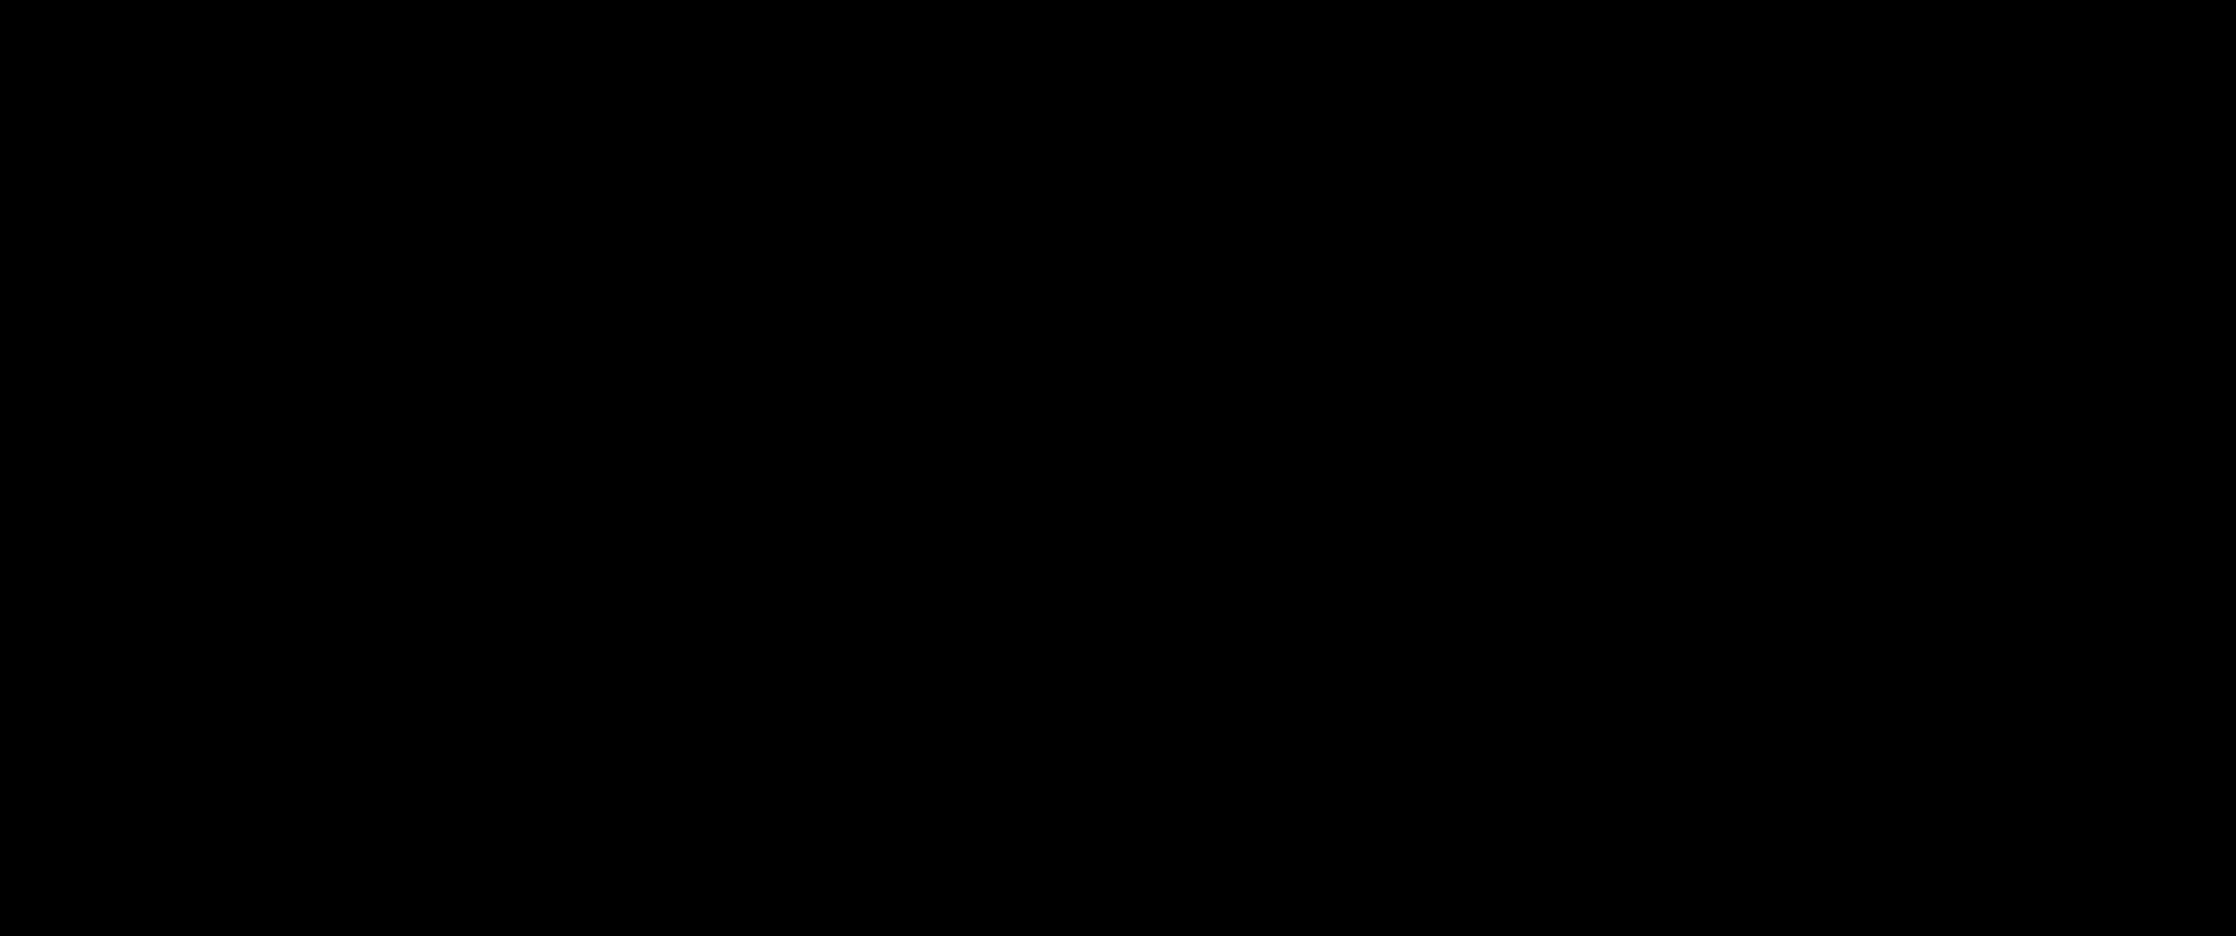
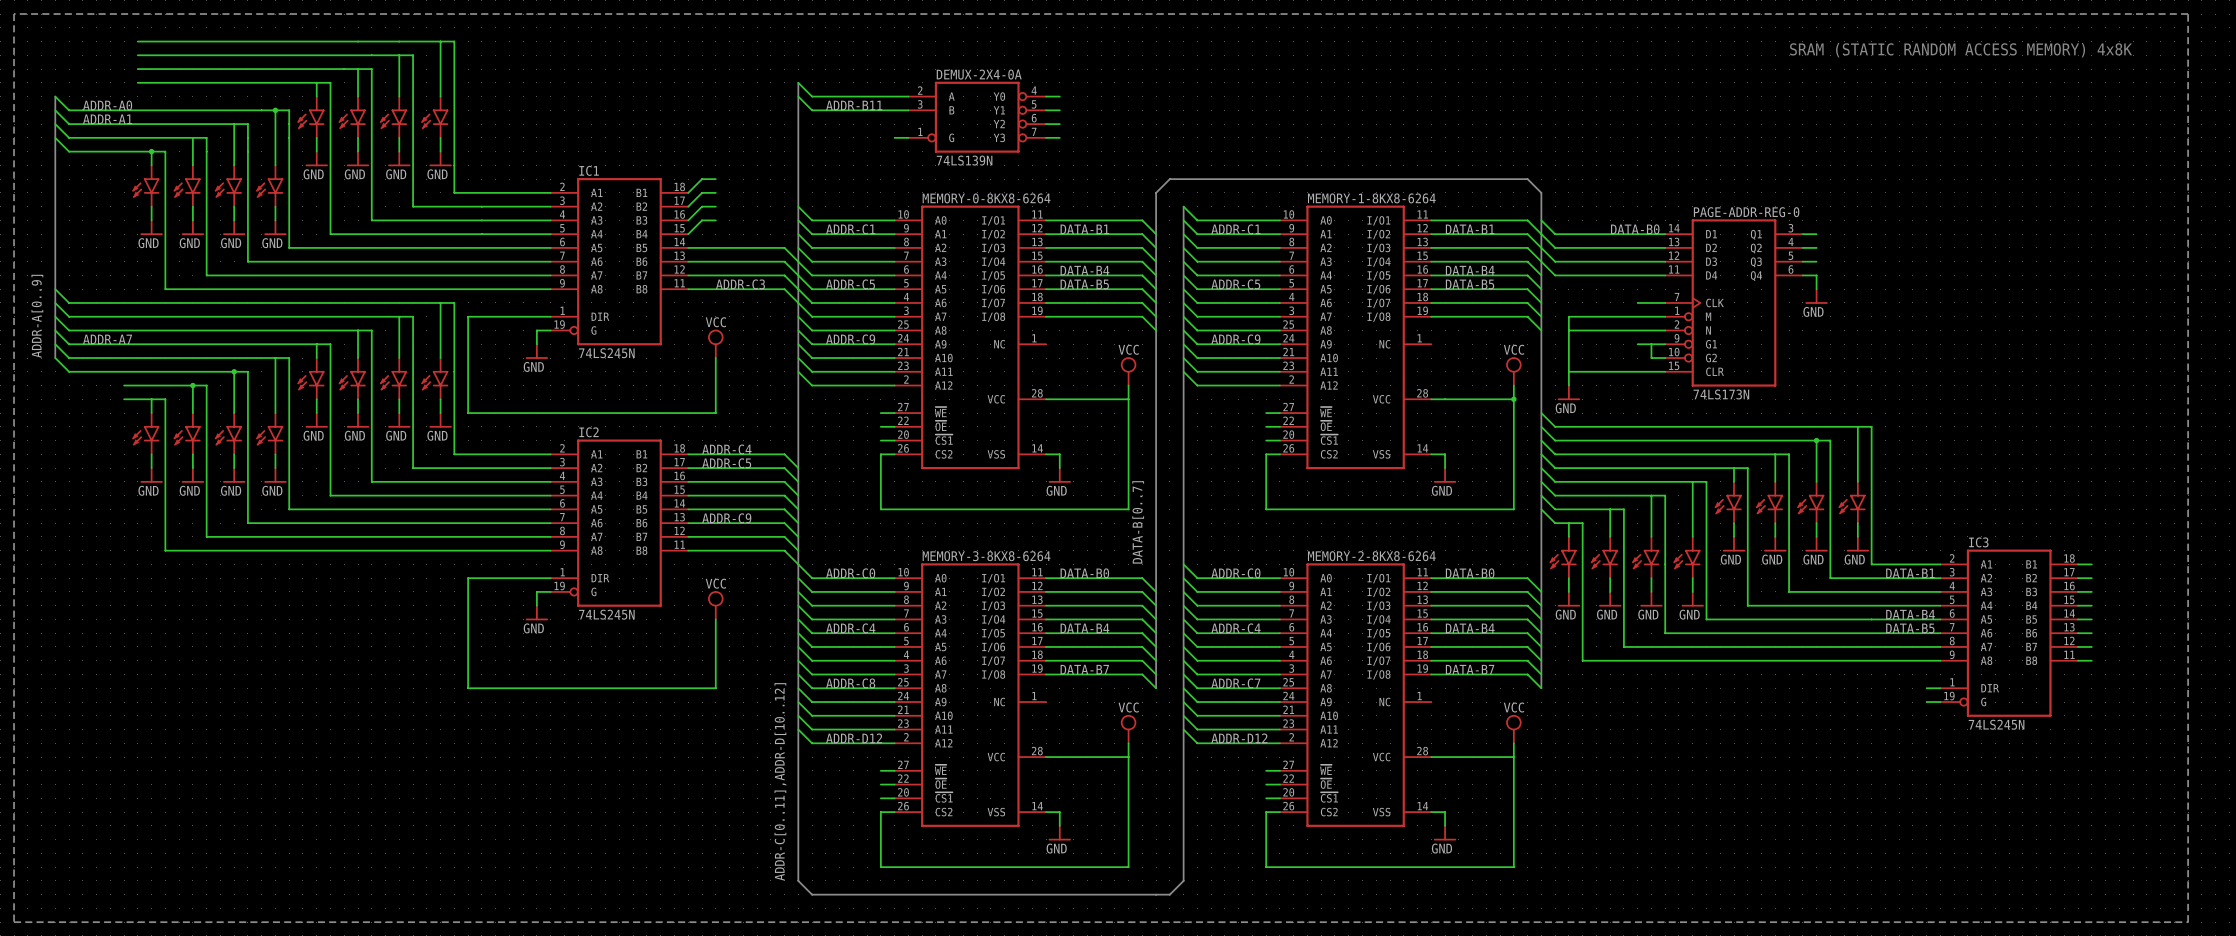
line: none -> (14, 14) (14, 922) (2188, 922) (2188, 14) (14, 14)
wire: none -> (137, 41) (454, 41) (454, 192) (550, 192)
wire: none -> (440, 41) (440, 96)
text: none -> SRAM (STATIC RANDOM ACCESS MEMORY) 4x8K (1961, 50)
wire: none -> (137, 55) (413, 55) (413, 206) (550, 206)
wire: none -> (399, 55) (399, 96)
wire: none -> (137, 69) (371, 69) (371, 220) (550, 220)
wire: none -> (358, 69) (358, 96)
wire: none -> (137, 82) (330, 82) (330, 234) (550, 234)
wire: none -> (316, 82) (316, 96)
bus: none -> (798, 82) (798, 880) (812, 894) (1169, 894) (1183, 880) (1183, 206)
wire: none -> (798, 82) (812, 96) (908, 96)
bus: none -> (55, 96) (55, 358)
wire: none -> (55, 96) (69, 110) (289, 110) (289, 247) (550, 247)
wire: none -> (798, 96) (812, 110) (908, 110)
wire: none -> (1046, 96) (1059, 96)
label: none -> ADDR-A0 (107, 105)
label: none -> ADDR-B11 (854, 105)
wire: none -> (55, 110) (69, 124) (247, 124) (247, 261) (550, 261)
wire: none -> (275, 110) (275, 165)
junction: none -> (275, 110)
wire: none -> (1046, 110) (1059, 110)
part: none -> (311, 117)
part: none -> (352, 117)
part: none -> (393, 117)
part: none -> (434, 117)
DEMUX-2X4-0A: none -> 74LS139N (977, 117)
label: none -> ADDR-A1 (107, 119)
wire: none -> (55, 124) (69, 137) (206, 137) (206, 275) (550, 275)
wire: none -> (234, 124) (234, 165)
wire: none -> (1046, 124) (1059, 124)
wire: none -> (55, 137) (69, 151) (165, 151) (165, 289) (550, 289)
wire: none -> (192, 137) (192, 165)
wire: none -> (316, 137) (316, 151)
wire: none -> (358, 137) (358, 151)
wire: none -> (399, 137) (399, 151)
wire: none -> (440, 137) (440, 151)
wire: none -> (894, 137) (908, 137)
wire: none -> (1046, 137) (1059, 137)
wire: none -> (151, 151) (151, 165)
junction: none -> (151, 151)
power symbol: none -> GND (316, 158)
power symbol: none -> GND (358, 158)
power symbol: none -> GND (399, 158)
power symbol: none -> GND (440, 158)
wire: none -> (715, 179) (702, 179) (688, 192)
part: none -> (145, 186)
part: none -> (187, 186)
part: none -> (228, 186)
part: none -> (269, 186)
wire: none -> (715, 192) (702, 192) (688, 206)
wire: none -> (151, 206) (151, 220)
wire: none -> (192, 206) (192, 220)
wire: none -> (234, 206) (234, 220)
wire: none -> (275, 206) (275, 220)
wire: none -> (715, 206) (702, 206) (688, 220)
wire: none -> (798, 206) (812, 220) (894, 220)
wire: none -> (1183, 206) (1197, 220) (1279, 220)
wire: none -> (715, 220) (702, 220) (688, 234)
wire: none -> (798, 220) (812, 234) (894, 234)
wire: none -> (1046, 220) (1142, 220) (1156, 234)
wire: none -> (1183, 220) (1197, 234) (1279, 234)
wire: none -> (1431, 220) (1527, 220) (1555, 247) (1665, 247)
wire: none -> (1541, 220) (1555, 234) (1665, 234)
power symbol: none -> GND (151, 227)
power symbol: none -> GND (192, 227)
power symbol: none -> GND (234, 227)
power symbol: none -> GND (275, 227)
label: none -> ADDR-C1 (850, 229)
label: none -> DATA-B1 (1084, 229)
label: none -> ADDR-C1 (1235, 229)
label: none -> DATA-B1 (1470, 229)
label: none -> DATA-B0 (1635, 229)
wire: none -> (798, 234) (812, 247) (894, 247)
wire: none -> (1046, 234) (1142, 234) (1156, 247)
wire: none -> (1183, 234) (1197, 247) (1279, 247)
wire: none -> (1431, 234) (1527, 234) (1555, 261) (1665, 261)
wire: none -> (1802, 234) (1816, 234)
wire: none -> (688, 247) (784, 247) (812, 275) (894, 275)
wire: none -> (798, 247) (812, 261) (894, 261)
wire: none -> (1046, 247) (1142, 247) (1156, 261)
wire: none -> (1183, 247) (1197, 261) (1279, 261)
wire: none -> (1431, 247) (1527, 247) (1555, 275) (1665, 275)
wire: none -> (1802, 247) (1816, 247)
IC1: none -> 74LS245N (619, 261)
wire: none -> (688, 261) (784, 261) (812, 289) (894, 289)
wire: none -> (1046, 261) (1142, 261) (1156, 275)
wire: none -> (1183, 261) (1197, 275) (1279, 275)
wire: none -> (1431, 261) (1527, 261) (1541, 275)
wire: none -> (1802, 261) (1816, 261)
label: none -> DATA-B4 (1084, 270)
label: none -> DATA-B4 (1470, 270)
wire: none -> (688, 275) (784, 275) (812, 302) (894, 302)
wire: none -> (1046, 275) (1142, 275) (1156, 289)
wire: none -> (1183, 275) (1197, 289) (1279, 289)
wire: none -> (1431, 275) (1527, 275) (1541, 289)
wire: none -> (1802, 275) (1816, 275) (1816, 289)
label: none -> ADDR-C3 (740, 284)
label: none -> ADDR-C5 (850, 284)
label: none -> DATA-B5 (1084, 284)
label: none -> ADDR-C5 (1235, 284)
label: none -> DATA-B5 (1470, 284)
wire: none -> (55, 289) (69, 302) (454, 302) (454, 454) (550, 454)
wire: none -> (688, 289) (784, 289) (812, 316) (894, 316)
wire: none -> (1046, 289) (1142, 289) (1156, 302)
wire: none -> (1183, 289) (1197, 302) (1279, 302)
wire: none -> (1431, 289) (1527, 289) (1541, 302)
power symbol: none -> GND (1816, 296)
wire: none -> (55, 302) (69, 316) (413, 316) (413, 468) (550, 468)
wire: none -> (440, 302) (440, 358)
wire: none -> (1046, 302) (1142, 302) (1156, 316)
wire: none -> (1183, 302) (1197, 316) (1279, 316)
wire: none -> (1431, 302) (1527, 302) (1541, 316)
wire: none -> (1637, 302) (1665, 302)
PAGE-ADDR-REG-0: none -> 74LS173N (1734, 302)
label: none -> ADDR-A[0..9] (37, 316)
wire: none -> (55, 316) (69, 330) (371, 330) (371, 481) (550, 481)
wire: none -> (399, 316) (399, 358)
wire: none -> (550, 316) (468, 316) (468, 413) (715, 413) (715, 358)
wire: none -> (798, 316) (812, 330) (894, 330)
wire: none -> (1046, 316) (1142, 316) (1156, 330)
wire: none -> (1183, 316) (1197, 330) (1279, 330)
wire: none -> (1431, 316) (1527, 316) (1541, 330)
wire: none -> (1665, 316) (1568, 316) (1568, 385)
wire: none -> (55, 330) (69, 344) (330, 344) (330, 495) (550, 495)
wire: none -> (358, 330) (358, 358)
wire: none -> (550, 330) (536, 330) (536, 344)
wire: none -> (798, 330) (812, 344) (894, 344)
wire: none -> (1183, 330) (1197, 344) (1279, 344)
wire: none -> (1568, 330) (1665, 330)
MEMORY-0-8KX8-6264: none -> (970, 337)
MEMORY-1-8KX8-6264: none -> (1355, 337)
label: none -> ADDR-A7 (107, 339)
label: none -> ADDR-C9 (850, 339)
label: none -> ADDR-C9 (1235, 339)
power symbol: none -> VCC (715, 343)
wire: none -> (55, 344) (69, 358) (289, 358) (289, 509) (550, 509)
wire: none -> (316, 344) (316, 358)
wire: none -> (798, 344) (812, 358) (894, 358)
wire: none -> (1183, 344) (1197, 358) (1279, 358)
wire: none -> (1637, 344) (1665, 344)
wire: none -> (1651, 344) (1651, 358) (1665, 358)
power symbol: none -> GND (536, 351)
wire: none -> (55, 358) (69, 371) (247, 371) (247, 523) (550, 523)
wire: none -> (275, 358) (275, 413)
wire: none -> (798, 358) (812, 371) (894, 371)
wire: none -> (1183, 358) (1197, 371) (1279, 371)
wire: none -> (234, 371) (234, 413)
junction: none -> (234, 371)
wire: none -> (798, 371) (812, 385) (894, 385)
power symbol: none -> VCC (1128, 371)
wire: none -> (1183, 371) (1197, 385) (1279, 385)
power symbol: none -> VCC (1513, 371)
wire: none -> (1568, 371) (1665, 371)
part: none -> (311, 378)
part: none -> (352, 378)
part: none -> (393, 378)
part: none -> (434, 378)
wire: none -> (124, 385) (206, 385) (206, 536) (550, 536)
wire: none -> (192, 385) (192, 413)
junction: none -> (192, 385)
wire: none -> (1128, 385) (1128, 509) (880, 509) (880, 454) (894, 454)
wire: none -> (1513, 385) (1513, 509) (1266, 509) (1266, 454) (1279, 454)
power symbol: none -> GND (1568, 392)
wire: none -> (124, 399) (165, 399) (165, 550) (550, 550)
wire: none -> (151, 399) (151, 413)
wire: none -> (316, 399) (316, 413)
wire: none -> (358, 399) (358, 413)
wire: none -> (399, 399) (399, 413)
wire: none -> (440, 399) (440, 413)
wire: none -> (1046, 399) (1128, 399)
wire: none -> (1431, 399) (1513, 399)
junction: none -> (1513, 399)
wire: none -> (880, 413) (894, 413)
wire: none -> (1266, 413) (1279, 413)
wire: none -> (1541, 413) (1555, 426) (1871, 426) (1871, 564) (1940, 564)
power symbol: none -> GND (316, 420)
power symbol: none -> GND (358, 420)
power symbol: none -> GND (399, 420)
power symbol: none -> GND (440, 420)
wire: none -> (880, 426) (894, 426)
wire: none -> (1266, 426) (1279, 426)
wire: none -> (1541, 426) (1555, 440) (1830, 440) (1830, 578) (1940, 578)
wire: none -> (1857, 426) (1857, 481)
part: none -> (145, 433)
part: none -> (187, 433)
part: none -> (228, 433)
part: none -> (269, 433)
wire: none -> (880, 440) (894, 440)
wire: none -> (1266, 440) (1279, 440)
wire: none -> (1541, 440) (1555, 454) (1789, 454) (1789, 591) (1940, 591)
wire: none -> (1816, 440) (1816, 481)
junction: none -> (1816, 440)
label: none -> ADDR-C4 (726, 449)
wire: none -> (151, 454) (151, 468)
wire: none -> (192, 454) (192, 468)
wire: none -> (234, 454) (234, 468)
wire: none -> (275, 454) (275, 468)
wire: none -> (688, 454) (784, 454) (798, 468)
wire: none -> (1046, 454) (1059, 454) (1059, 468)
wire: none -> (1431, 454) (1445, 454) (1445, 468)
wire: none -> (1541, 454) (1555, 468) (1747, 468) (1747, 605) (1940, 605)
wire: none -> (1775, 454) (1775, 481)
label: none -> ADDR-C5 (726, 463)
wire: none -> (688, 468) (784, 468) (798, 481)
wire: none -> (1541, 468) (1555, 481) (1706, 481) (1706, 619) (1940, 619)
wire: none -> (1734, 468) (1734, 481)
power symbol: none -> GND (151, 475)
power symbol: none -> GND (192, 475)
power symbol: none -> GND (234, 475)
power symbol: none -> GND (275, 475)
power symbol: none -> GND (1059, 475)
power symbol: none -> GND (1445, 475)
wire: none -> (688, 481) (784, 481) (798, 495)
wire: none -> (1541, 481) (1555, 495) (1665, 495) (1665, 633) (1940, 633)
wire: none -> (1692, 481) (1692, 536)
wire: none -> (688, 495) (784, 495) (798, 509)
wire: none -> (1541, 495) (1555, 509) (1623, 509) (1623, 646) (1940, 646)
wire: none -> (1651, 495) (1651, 536)
part: none -> (1728, 502)
part: none -> (1769, 502)
part: none -> (1810, 502)
part: none -> (1852, 502)
wire: none -> (688, 509) (784, 509) (798, 523)
wire: none -> (1541, 509) (1555, 523) (1582, 523) (1582, 660) (1940, 660)
wire: none -> (1610, 509) (1610, 536)
label: none -> ADDR-C9 (726, 518)
label: none -> DATA-B[0..7] (1138, 522)
IC2: none -> 74LS245N (619, 523)
wire: none -> (688, 523) (784, 523) (798, 536)
wire: none -> (1568, 523) (1568, 536)
wire: none -> (1734, 523) (1734, 536)
wire: none -> (1775, 523) (1775, 536)
wire: none -> (1816, 523) (1816, 536)
wire: none -> (1857, 523) (1857, 536)
wire: none -> (688, 536) (784, 536) (798, 550)
power symbol: none -> GND (1734, 544)
power symbol: none -> GND (1775, 544)
power symbol: none -> GND (1816, 544)
power symbol: none -> GND (1857, 544)
wire: none -> (688, 550) (784, 550) (812, 578) (894, 578)
part: none -> (1563, 557)
part: none -> (1604, 557)
part: none -> (1645, 557)
part: none -> (1687, 557)
wire: none -> (1183, 564) (1197, 578) (1279, 578)
wire: none -> (2078, 564) (2091, 564)
label: none -> ADDR-C0 (850, 573)
label: none -> DATA-B0 (1084, 573)
label: none -> ADDR-C0 (1235, 573)
label: none -> DATA-B0 (1470, 573)
label: none -> DATA-B1 (1910, 573)
wire: none -> (550, 578) (468, 578) (468, 688) (715, 688) (715, 619)
wire: none -> (798, 578) (812, 591) (894, 591)
wire: none -> (1046, 578) (1142, 578) (1156, 591)
wire: none -> (1183, 578) (1197, 591) (1279, 591)
wire: none -> (1431, 578) (1527, 578) (1541, 591)
wire: none -> (1568, 578) (1568, 591)
wire: none -> (1610, 578) (1610, 591)
wire: none -> (1651, 578) (1651, 591)
wire: none -> (1692, 578) (1692, 591)
wire: none -> (2078, 578) (2091, 578)
wire: none -> (550, 591) (536, 591) (536, 605)
wire: none -> (798, 591) (812, 605) (894, 605)
wire: none -> (1046, 591) (1142, 591) (1156, 605)
wire: none -> (1183, 591) (1197, 605) (1279, 605)
wire: none -> (1431, 591) (1527, 591) (1541, 605)
wire: none -> (2078, 591) (2091, 591)
power symbol: none -> GND (1568, 599)
power symbol: none -> GND (1610, 599)
power symbol: none -> GND (1651, 599)
power symbol: none -> GND (1692, 599)
power symbol: none -> VCC (715, 605)
wire: none -> (798, 605) (812, 619) (894, 619)
wire: none -> (1046, 605) (1142, 605) (1156, 619)
wire: none -> (1183, 605) (1197, 619) (1279, 619)
wire: none -> (1431, 605) (1527, 605) (1541, 619)
wire: none -> (2078, 605) (2091, 605)
power symbol: none -> GND (536, 612)
label: none -> DATA-B4 (1910, 614)
wire: none -> (798, 619) (812, 633) (894, 633)
wire: none -> (1046, 619) (1142, 619) (1156, 633)
wire: none -> (1183, 619) (1197, 633) (1279, 633)
wire: none -> (1431, 619) (1527, 619) (1541, 633)
wire: none -> (2078, 619) (2091, 619)
label: none -> ADDR-C4 (850, 628)
label: none -> DATA-B4 (1084, 628)
label: none -> ADDR-C4 (1236, 628)
label: none -> DATA-B4 (1470, 628)
label: none -> DATA-B5 (1910, 628)
wire: none -> (798, 633) (812, 646) (894, 646)
wire: none -> (1046, 633) (1142, 633) (1156, 646)
wire: none -> (1183, 633) (1197, 646) (1279, 646)
wire: none -> (1431, 633) (1527, 633) (1541, 646)
IC3: none -> 74LS245N (2009, 633)
wire: none -> (2078, 633) (2091, 633)
wire: none -> (798, 646) (812, 660) (894, 660)
wire: none -> (1046, 646) (1142, 646) (1156, 660)
wire: none -> (1183, 646) (1197, 660) (1279, 660)
wire: none -> (1431, 646) (1527, 646) (1541, 660)
wire: none -> (2078, 646) (2091, 646)
wire: none -> (798, 660) (812, 674) (894, 674)
wire: none -> (1046, 660) (1142, 660) (1156, 674)
wire: none -> (1183, 660) (1197, 674) (1279, 674)
wire: none -> (1431, 660) (1527, 660) (1541, 674)
wire: none -> (2078, 660) (2091, 660)
label: none -> DATA-B7 (1084, 669)
label: none -> DATA-B7 (1470, 669)
wire: none -> (798, 674) (812, 688) (894, 688)
wire: none -> (1046, 674) (1142, 674) (1156, 688)
wire: none -> (1183, 674) (1197, 688) (1279, 688)
wire: none -> (1431, 674) (1527, 674) (1541, 688)
label: none -> ADDR-C8 (850, 683)
label: none -> ADDR-C7 (1235, 683)
wire: none -> (798, 688) (812, 702) (894, 702)
bus: none -> (1156, 688) (1156, 192) (1169, 179) (1527, 179) (1541, 192) (1541, 688)
wire: none -> (1183, 688) (1197, 702) (1279, 702)
wire: none -> (1926, 688) (1940, 688)
MEMORY-3-8KX8-6264: none -> (970, 695)
MEMORY-2-8KX8-6264: none -> (1355, 695)
wire: none -> (798, 702) (812, 715) (894, 715)
wire: none -> (1183, 702) (1197, 715) (1279, 715)
wire: none -> (1926, 702) (1940, 702)
wire: none -> (798, 715) (812, 729) (894, 729)
wire: none -> (1183, 715) (1197, 729) (1279, 729)
wire: none -> (798, 729) (812, 743) (894, 743)
power symbol: none -> VCC (1128, 729)
wire: none -> (1183, 729) (1197, 743) (1279, 743)
power symbol: none -> VCC (1513, 729)
label: none -> ADDR-D12 (854, 738)
label: none -> ADDR-D12 (1239, 738)
wire: none -> (1128, 743) (1128, 867) (880, 867) (880, 812) (894, 812)
wire: none -> (1513, 743) (1513, 867) (1266, 867) (1266, 812) (1279, 812)
wire: none -> (1046, 757) (1128, 757)
wire: none -> (1431, 757) (1513, 757)
wire: none -> (880, 770) (894, 770)
wire: none -> (1266, 770) (1279, 770)
label: none -> ADDR-C[0..11],ADDR-D[10..12] (780, 781)
wire: none -> (880, 784) (894, 784)
wire: none -> (1266, 784) (1279, 784)
wire: none -> (880, 798) (894, 798)
wire: none -> (1266, 798) (1279, 798)
wire: none -> (1046, 812) (1059, 812) (1059, 825)
wire: none -> (1431, 812) (1445, 812) (1445, 825)
power symbol: none -> GND (1059, 833)
power symbol: none -> GND (1445, 833)

